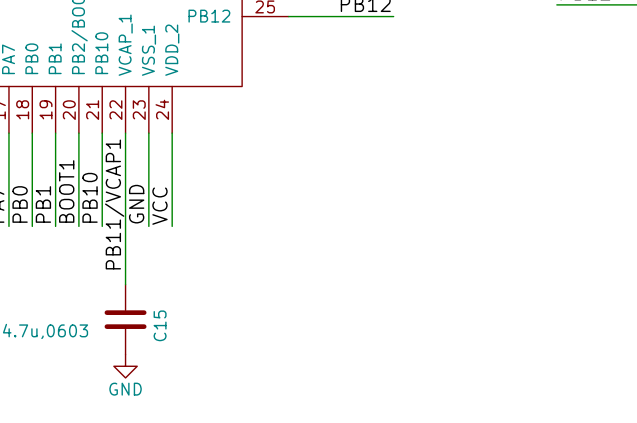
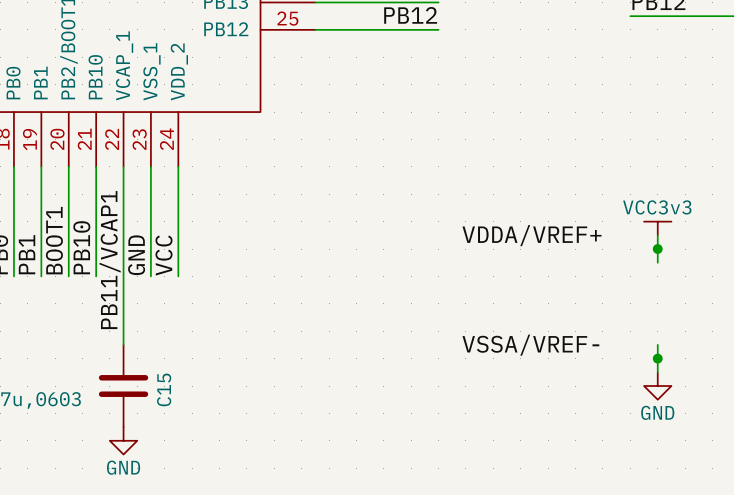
power symbol: none -> VCC3v3 (657, 228)
wire: none -> (657, 235) (657, 262)
label: none -> VDDA/VREF+ (532, 235)
junction: none -> (657, 249)
wire: none -> (657, 344) (657, 372)
label: none -> VSSA/VREF- (530, 345)
junction: none -> (657, 358)
power symbol: none -> GND (657, 386)

